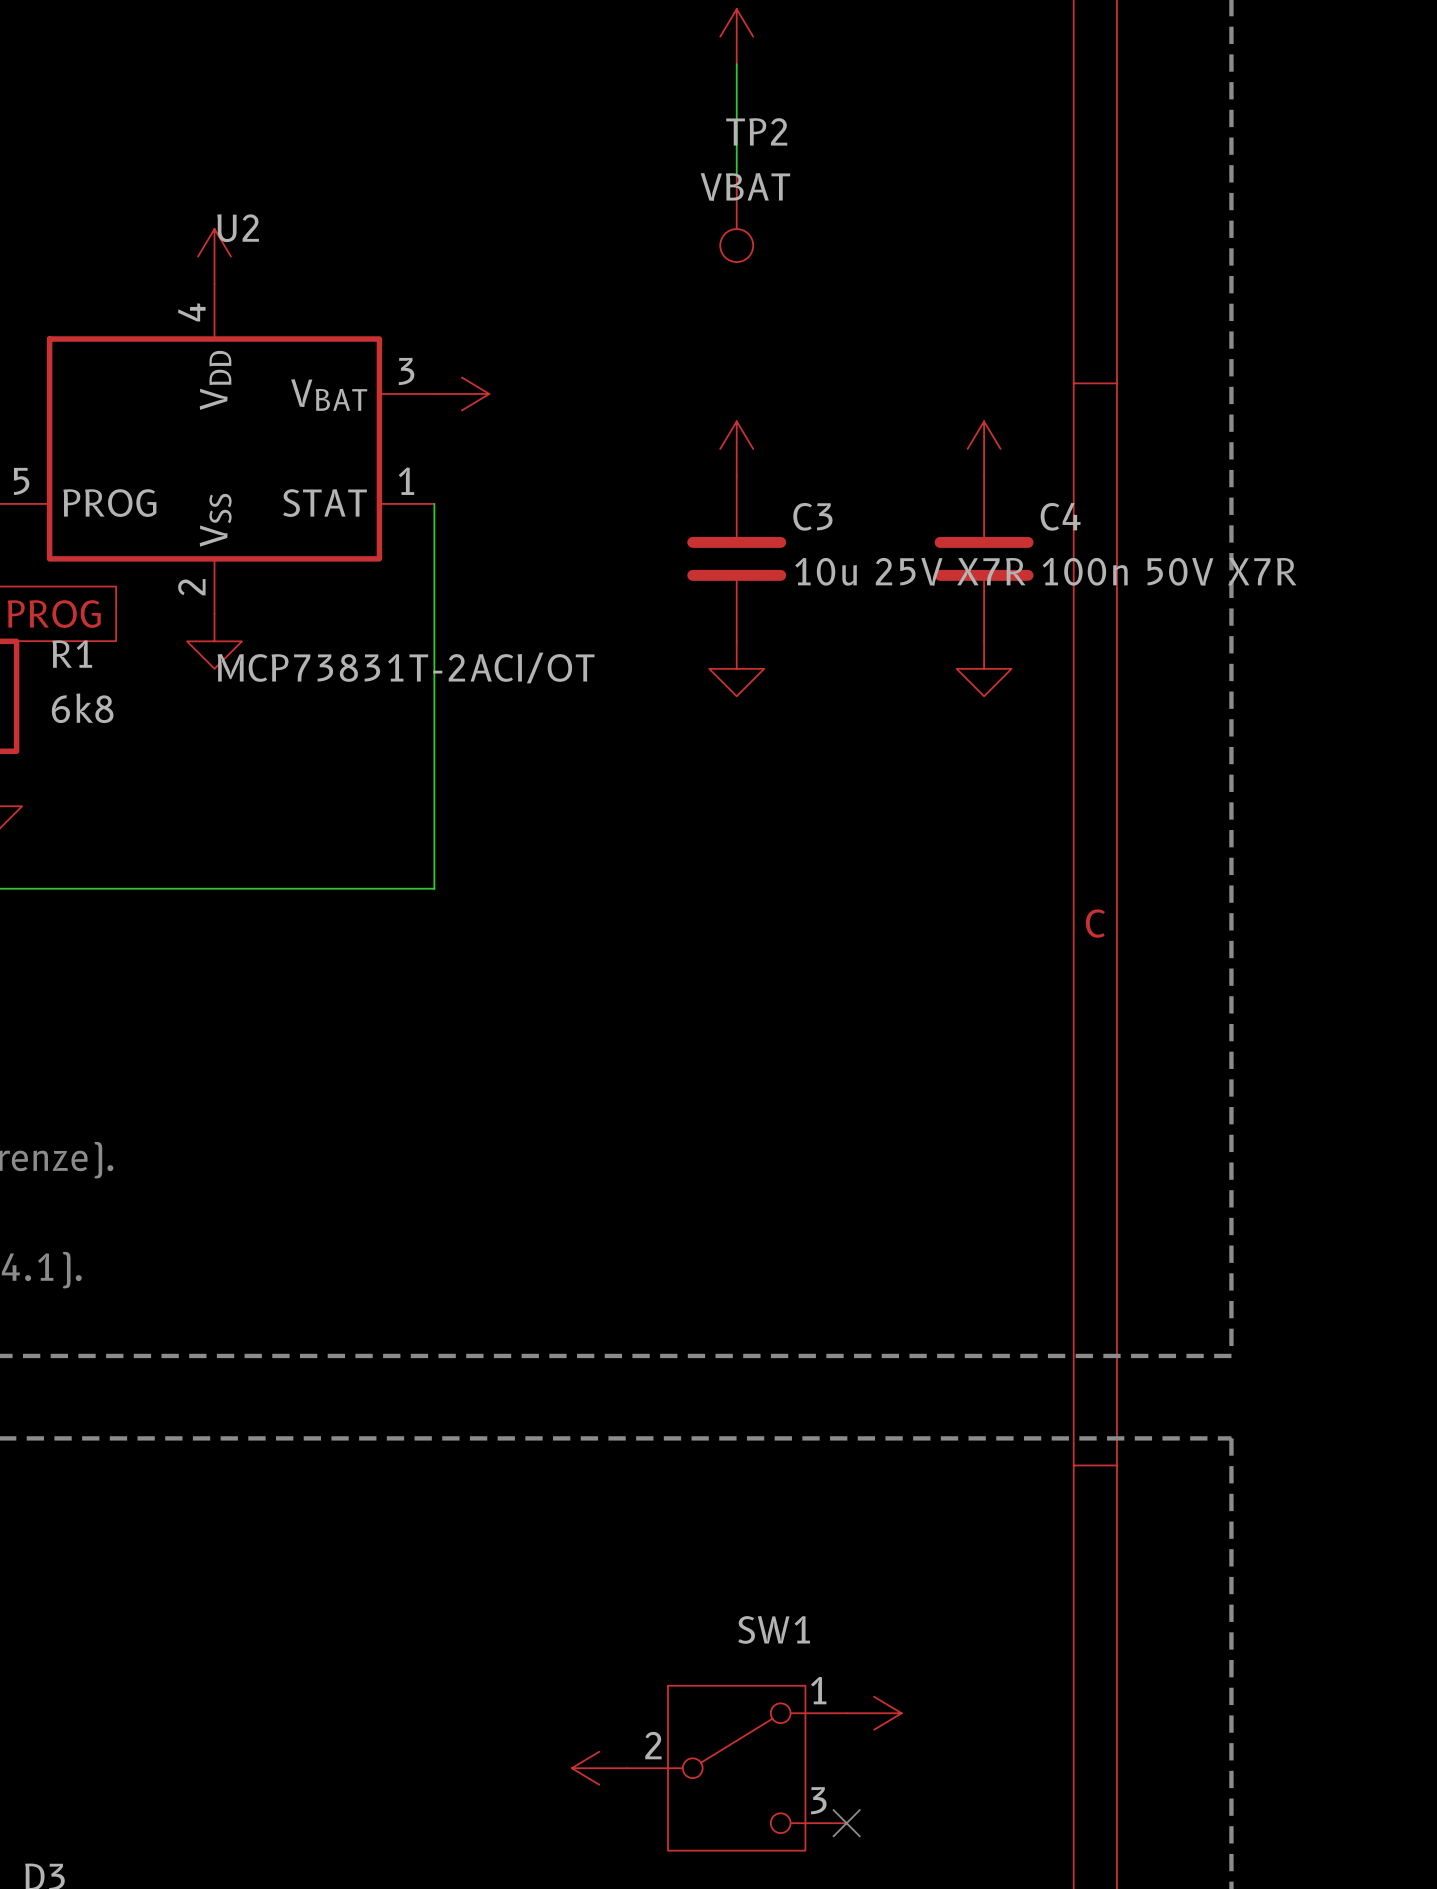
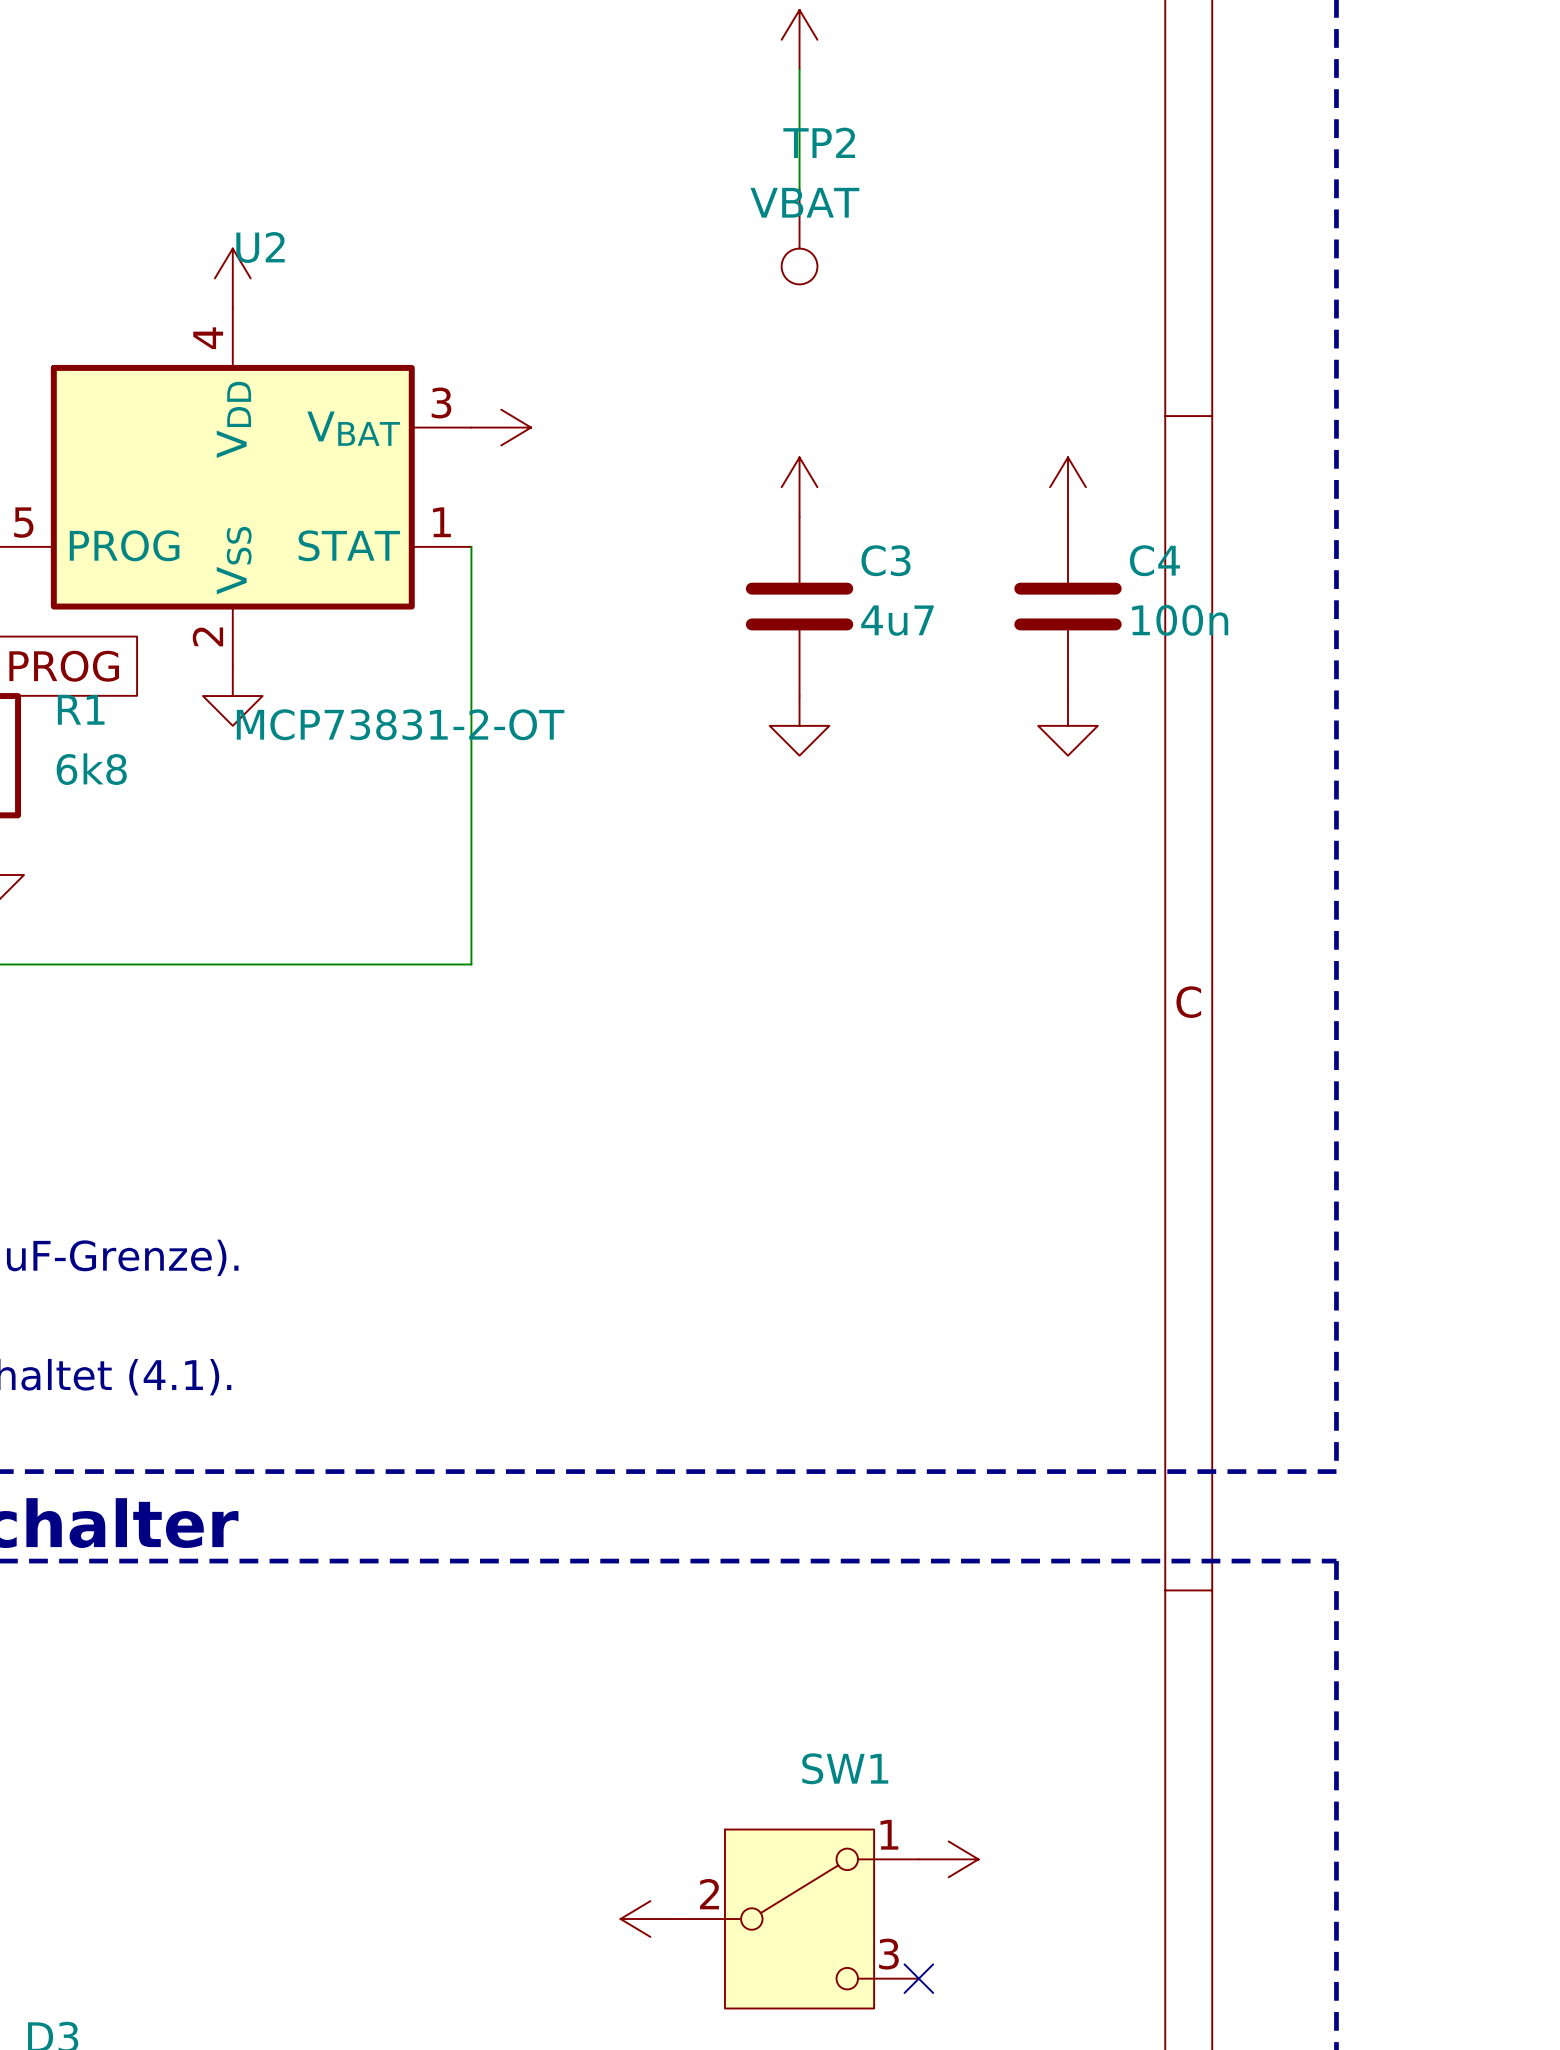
C3 value: 10u 25V X7R (910, 571) -> 4u7 (897, 620)
C4 value: 100n 50V X7R (1169, 571) -> 100n (1180, 620)
U2 value: MCP73831T-2ACI/OT (406, 667) -> MCP73831-2-OT (400, 724)

